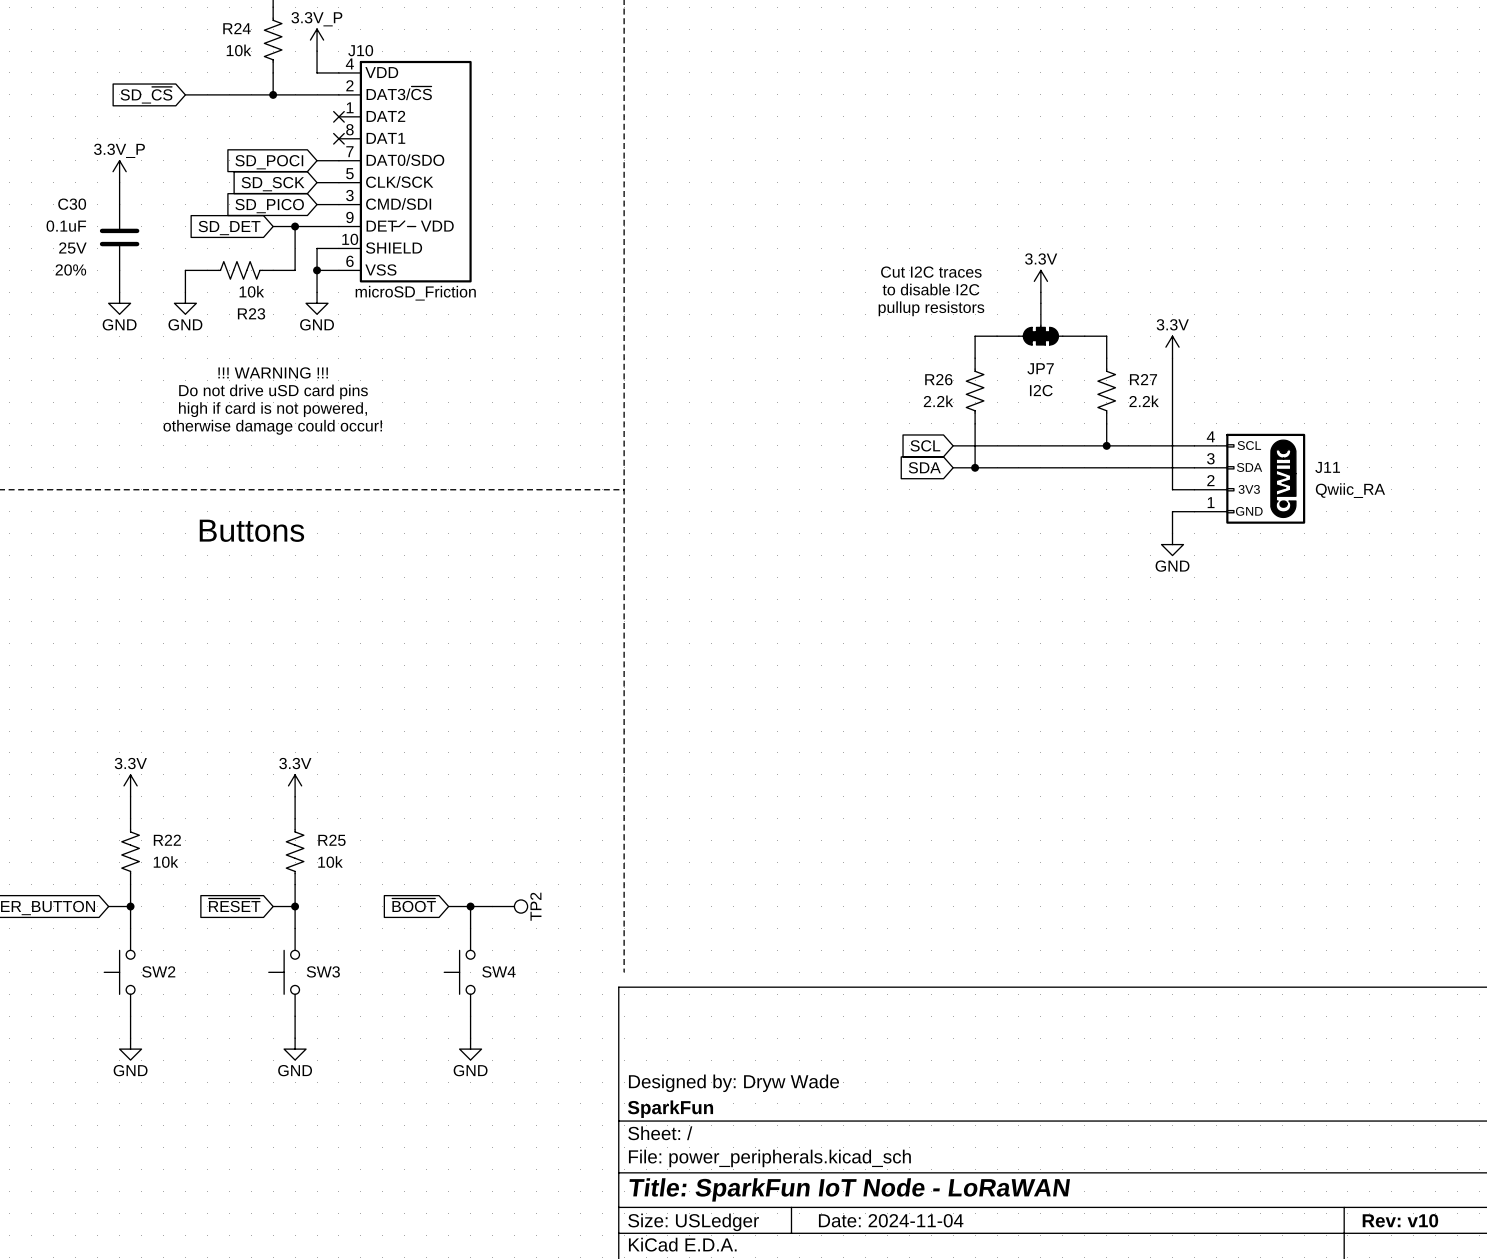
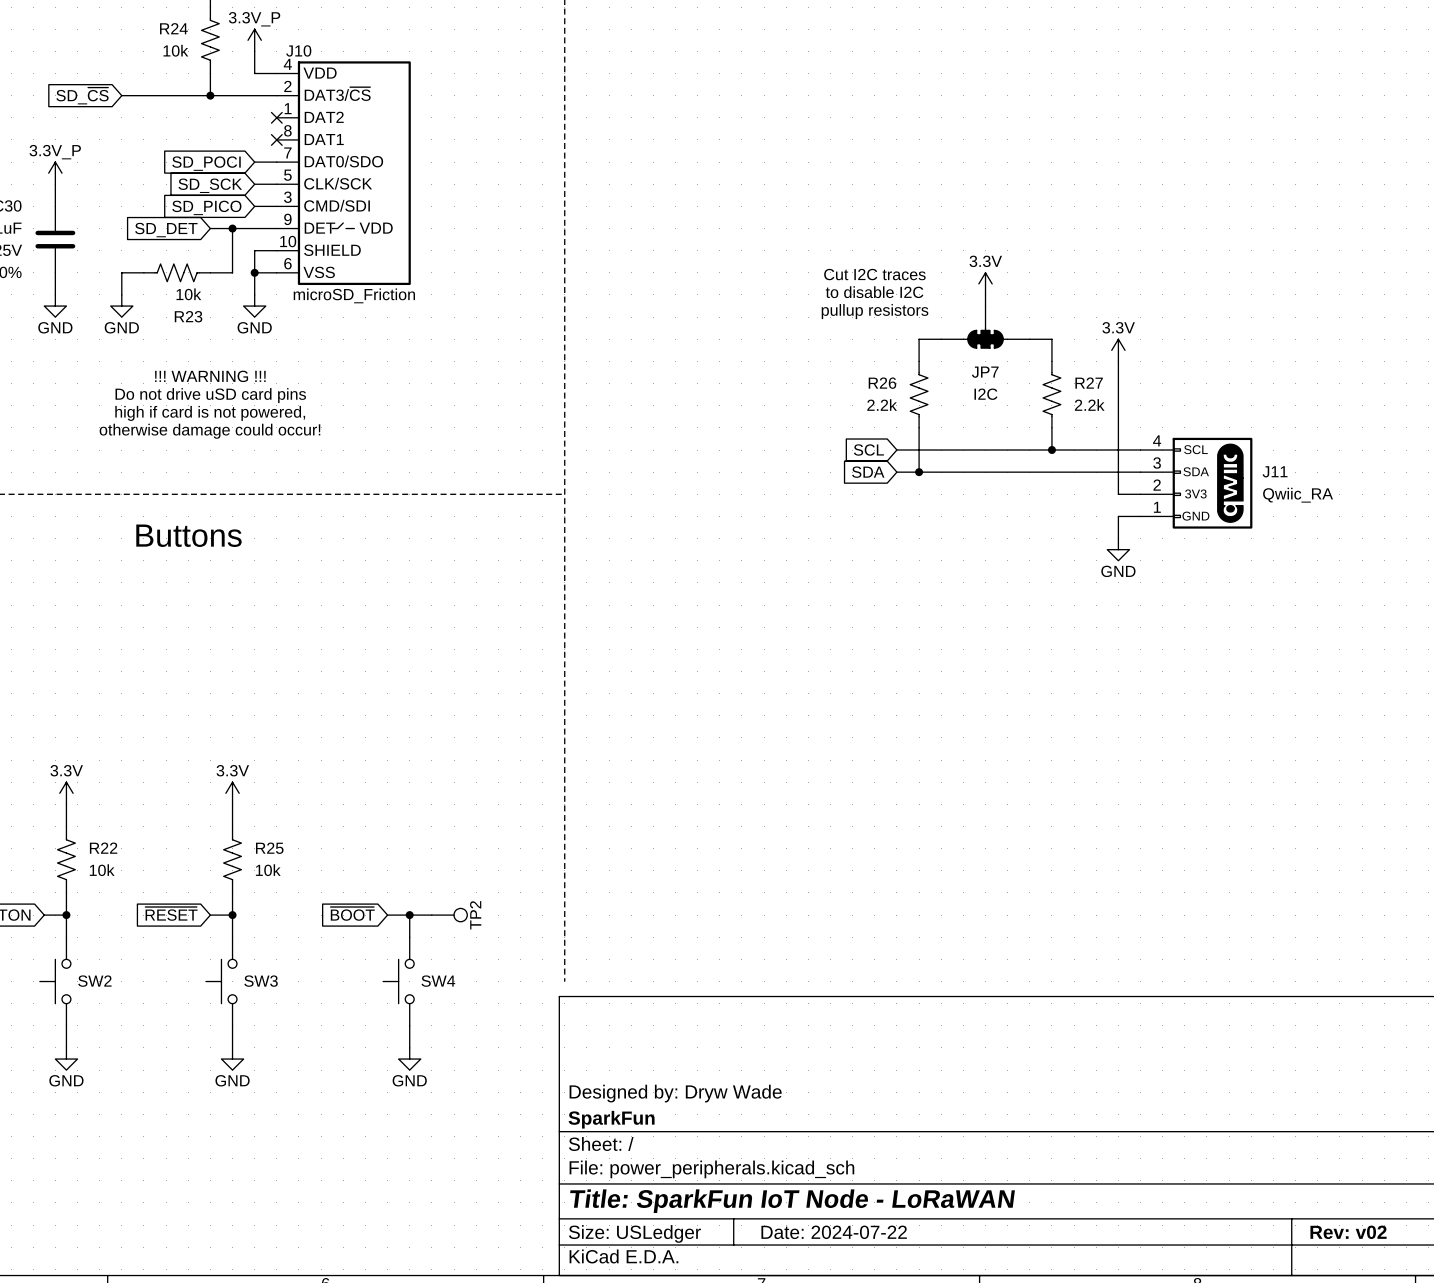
title block: Date: 2024-11-04 (891, 1220) -> Date: 2024-07-22 (834, 1232)
title block: Rev: v10 (1400, 1220) -> Rev: v02 (1348, 1232)

